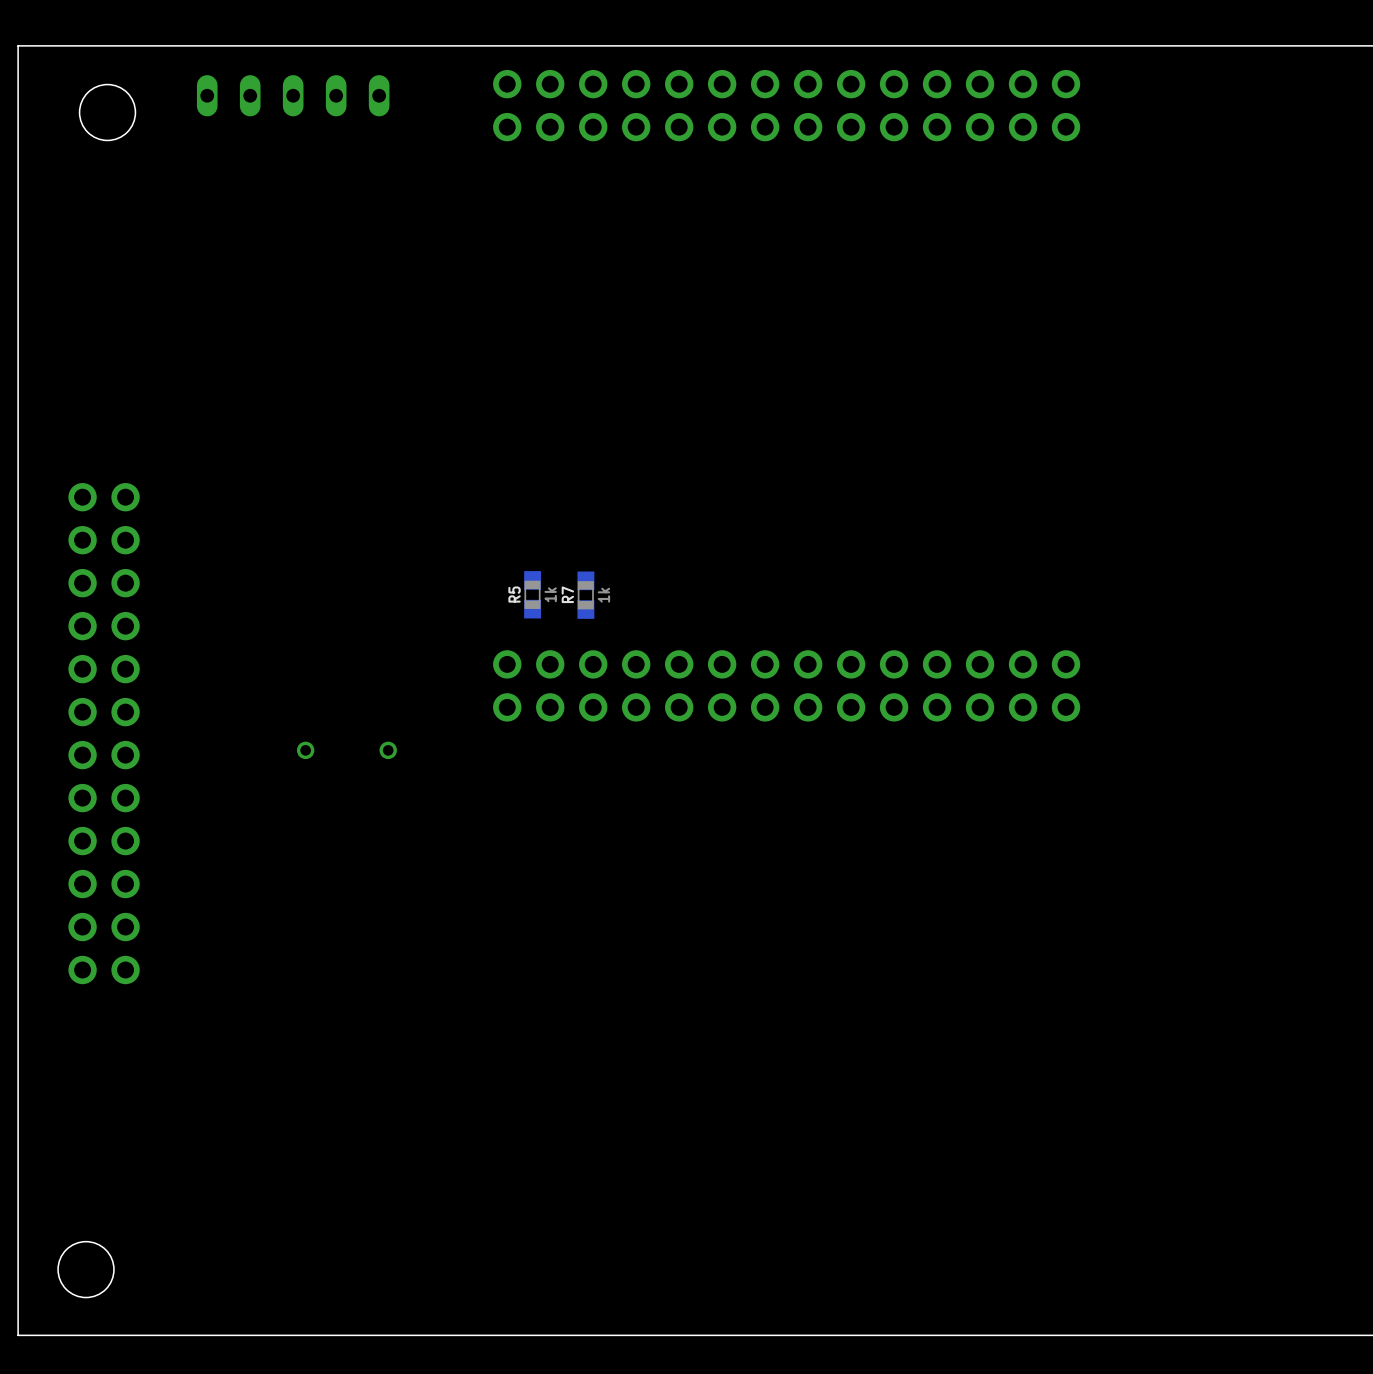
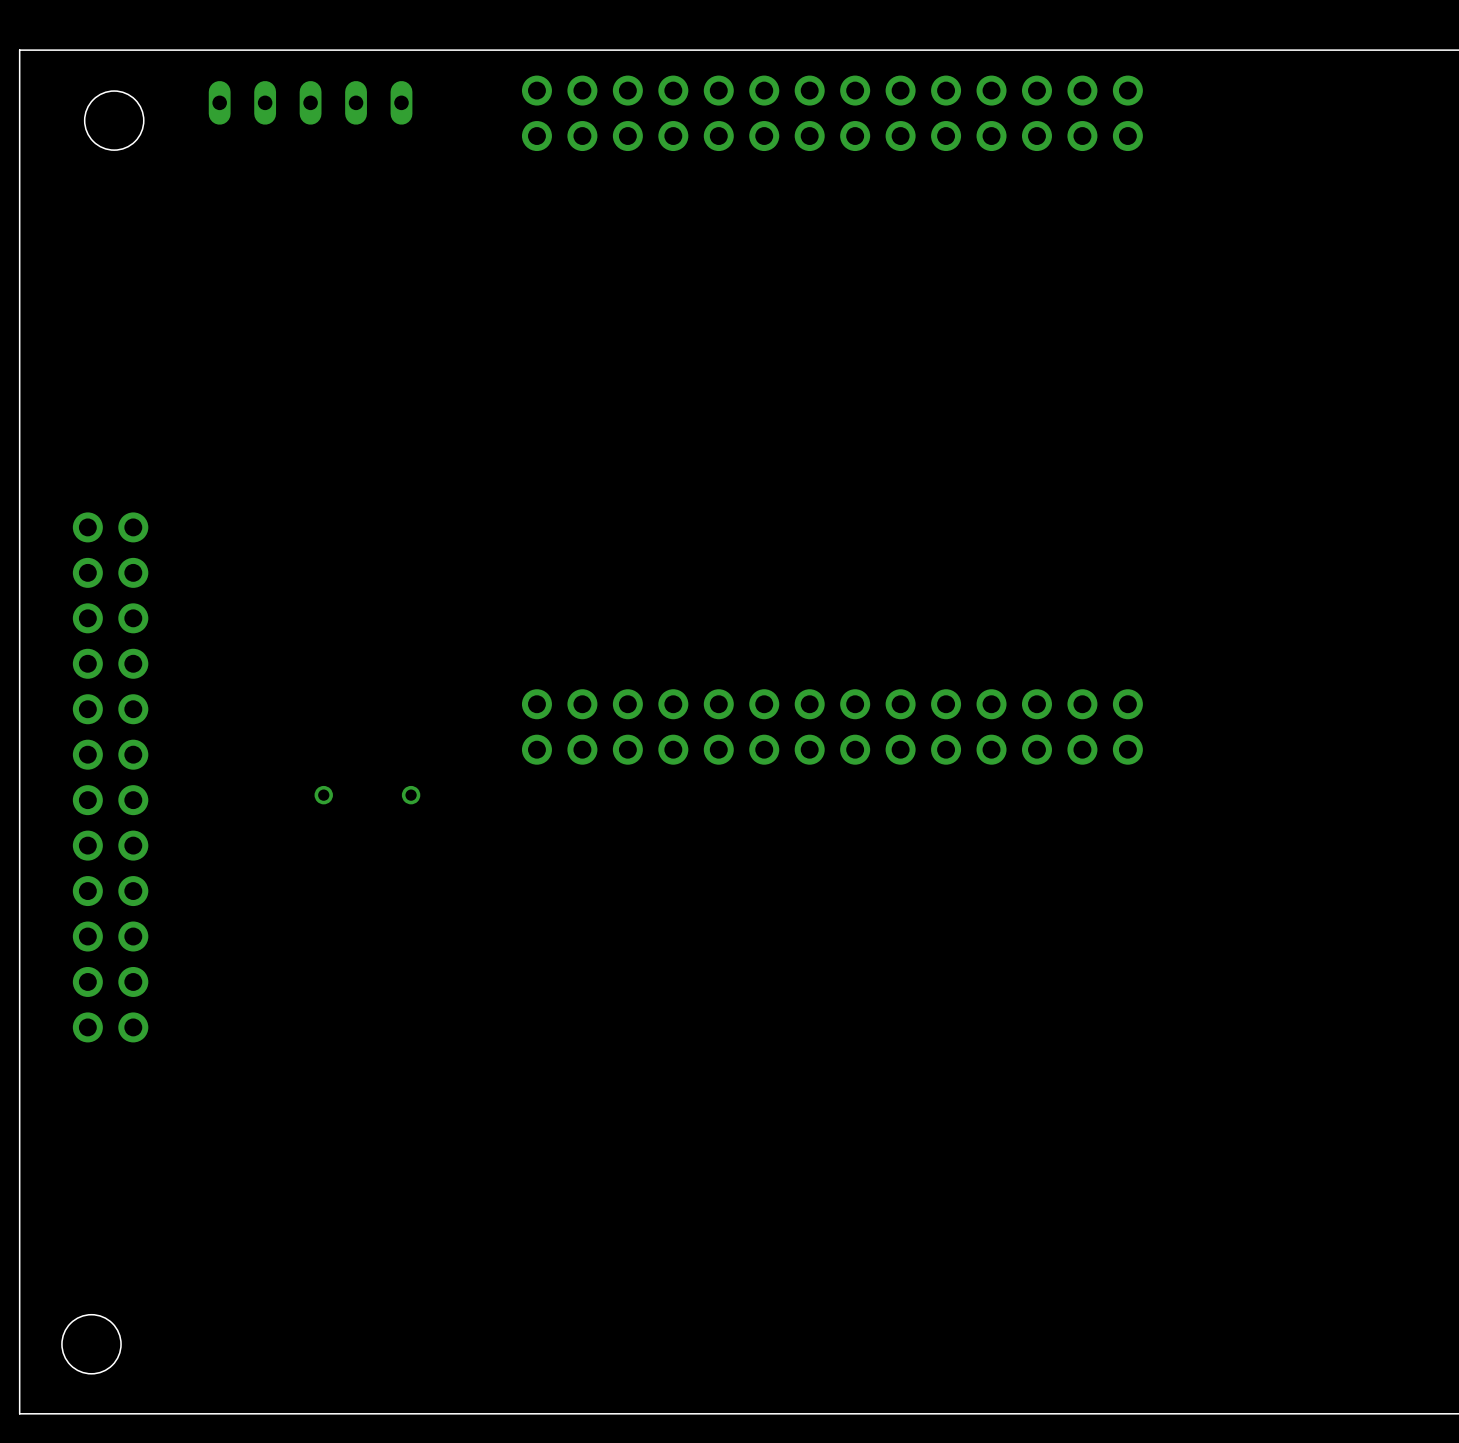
R5: 1k (532, 594) -> none
R7: 1k (585, 595) -> none

